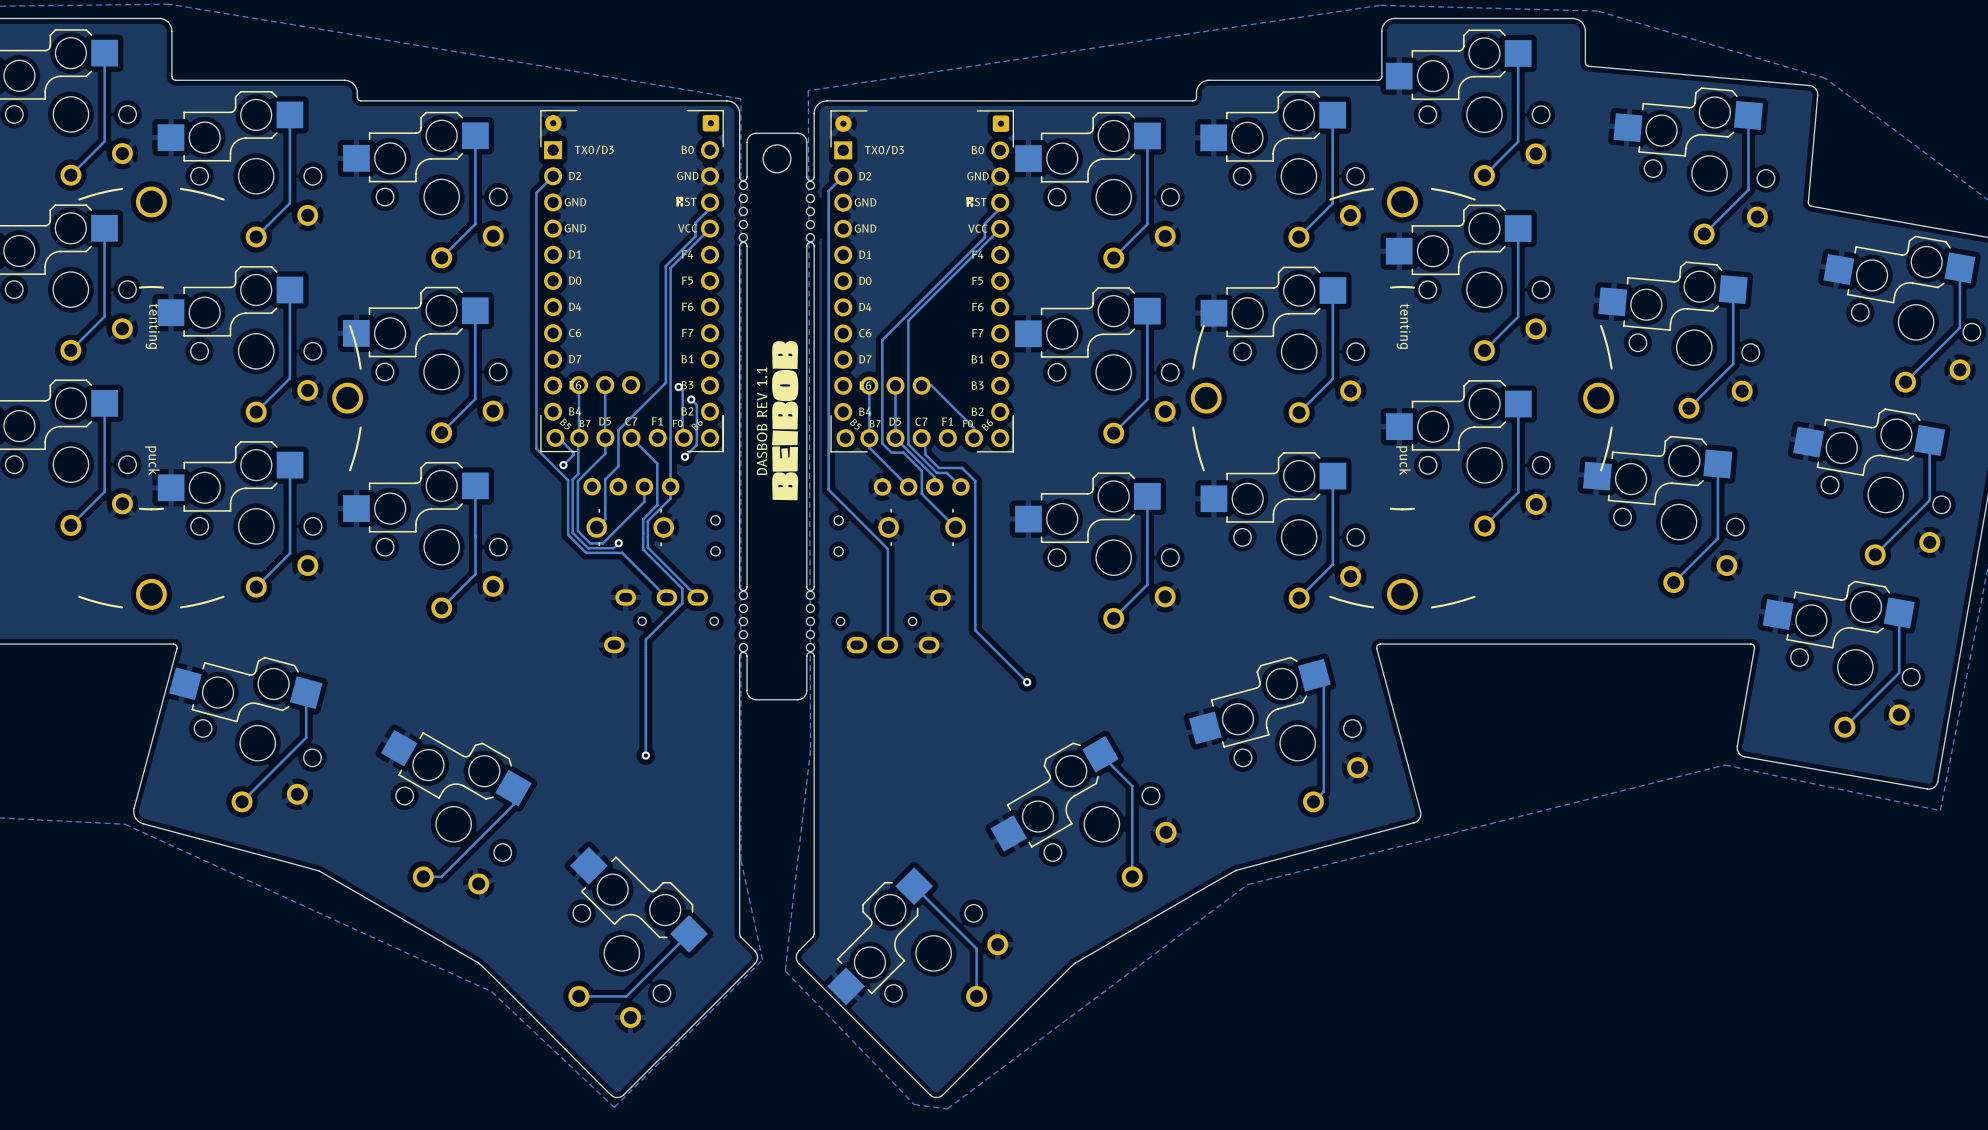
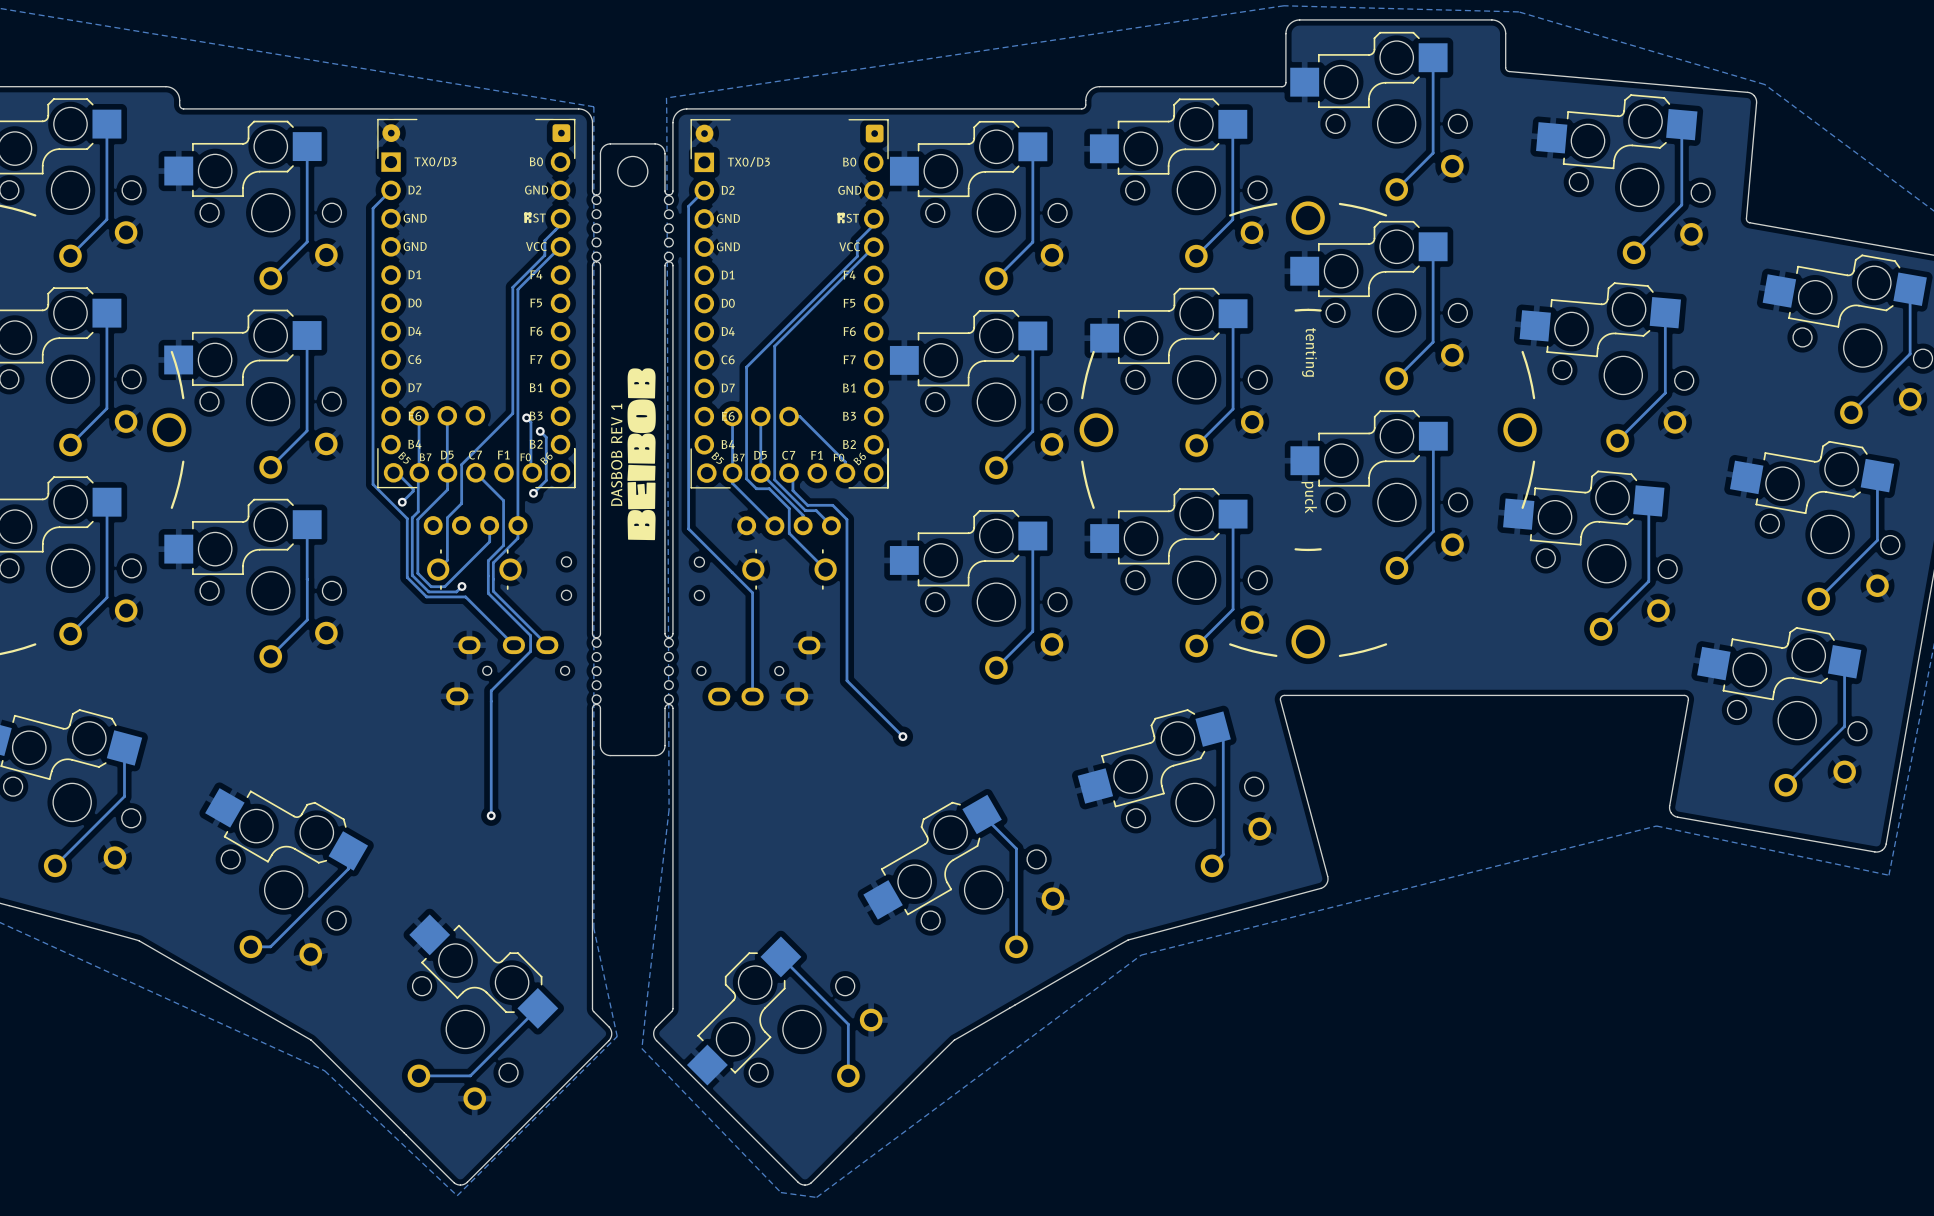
text: DASBOB REV 1.1 (762, 421) -> DASBOB REV 1 (616, 454)

